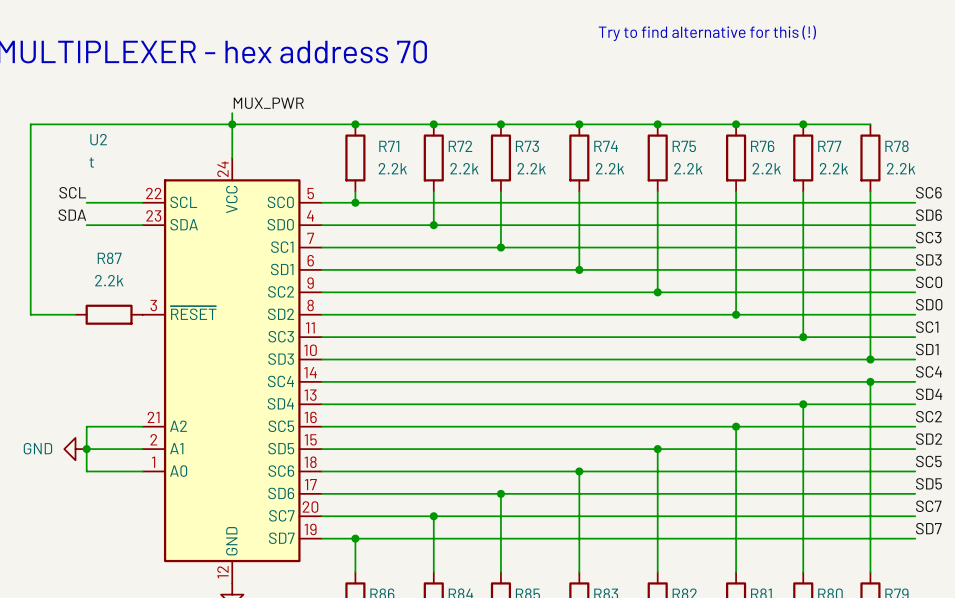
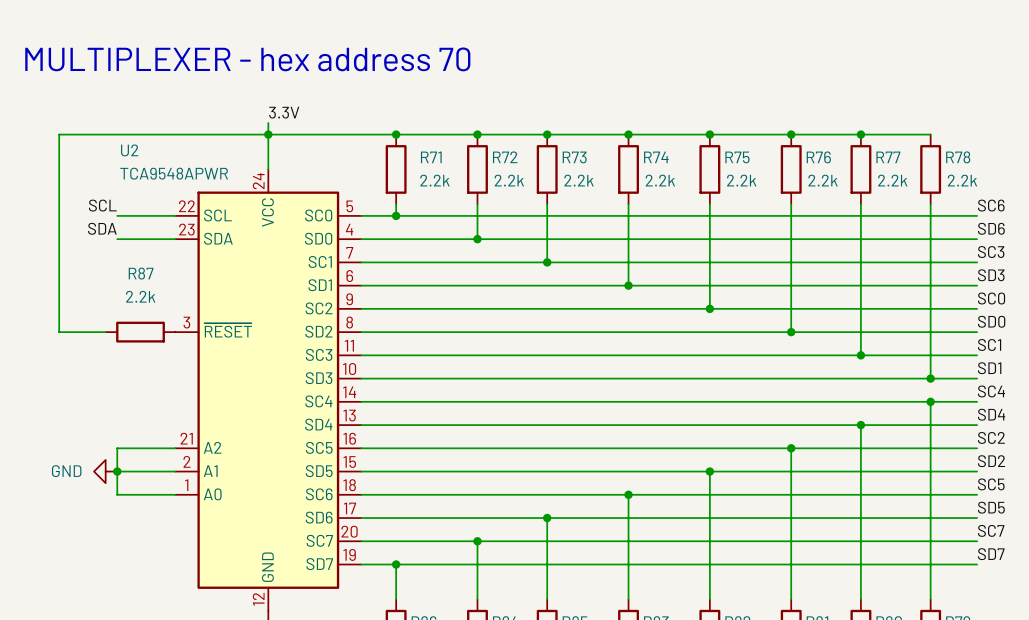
text: Try to find alternative for this (!) (707, 33) -> none
label: MUX_PWR (268, 103) -> 3.3V (284, 112)
U2 value: t (91, 162) -> TCA9548APWR (174, 173)

